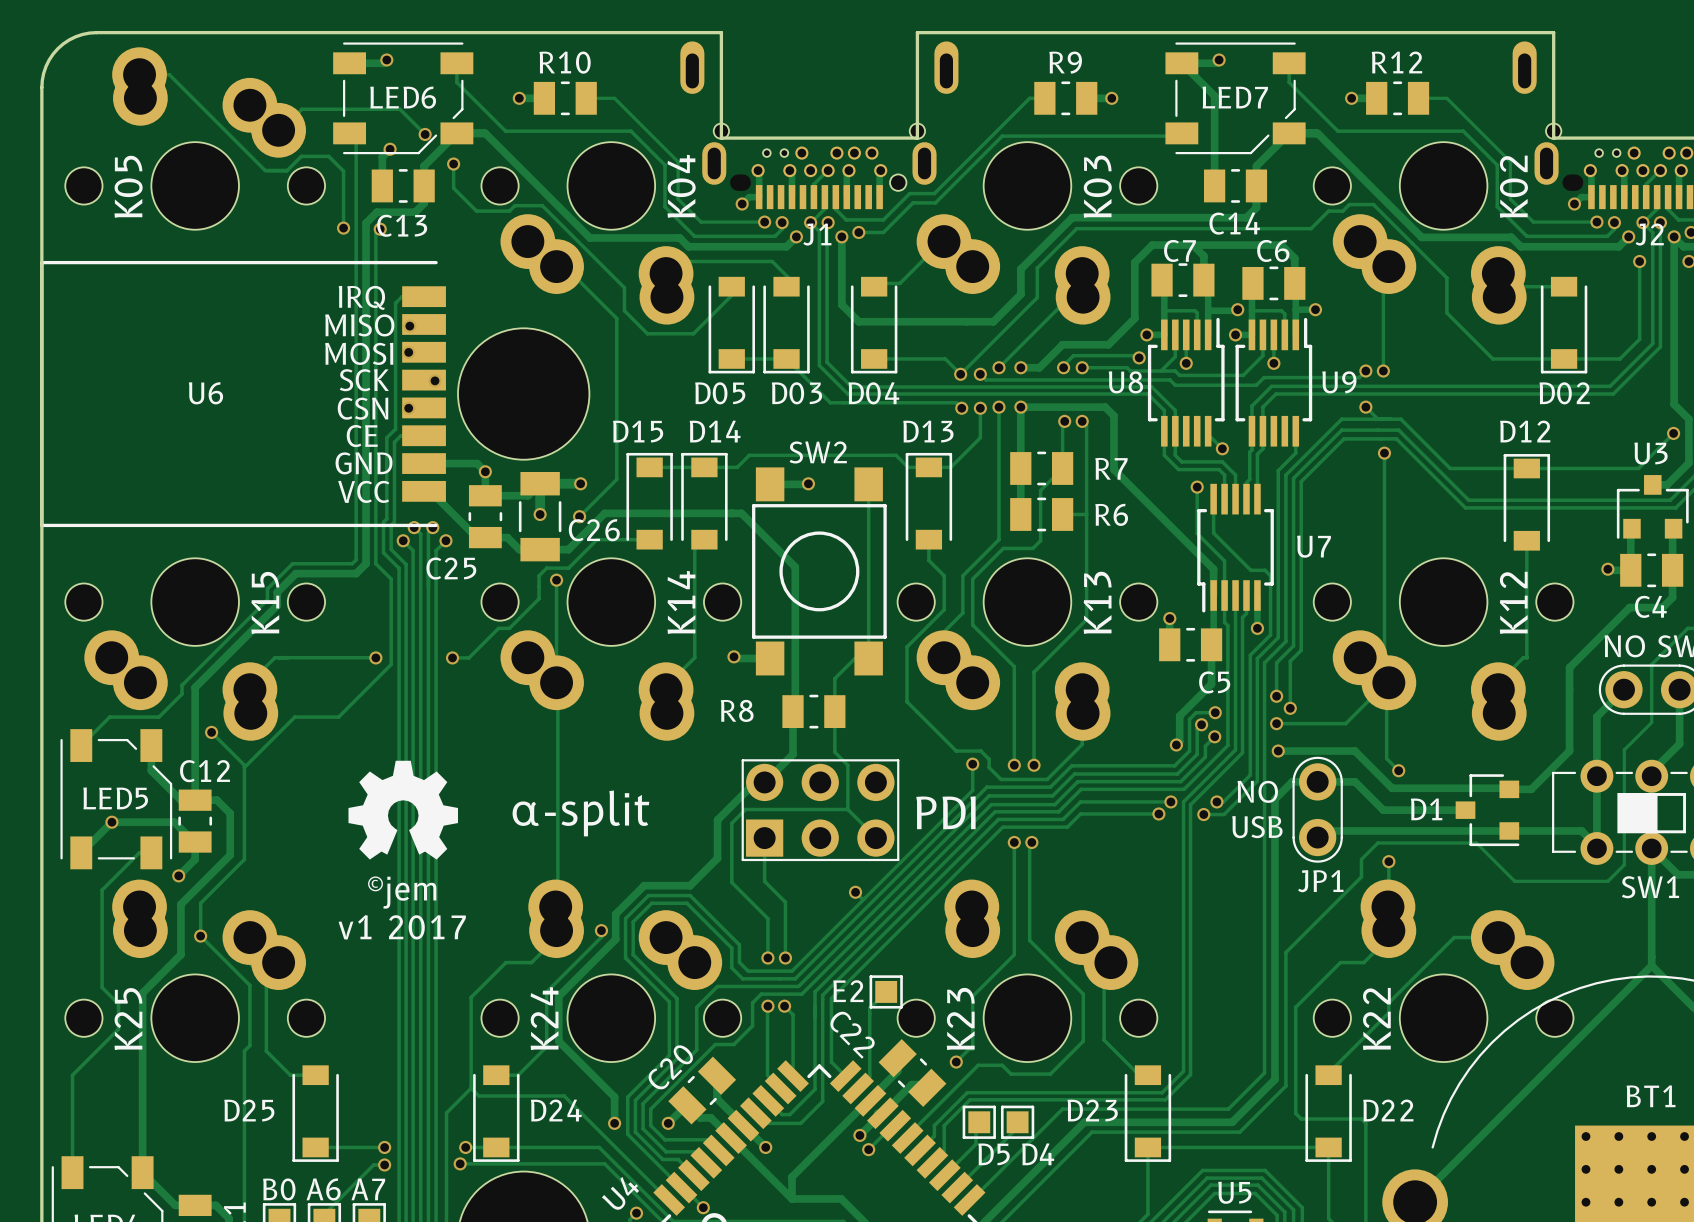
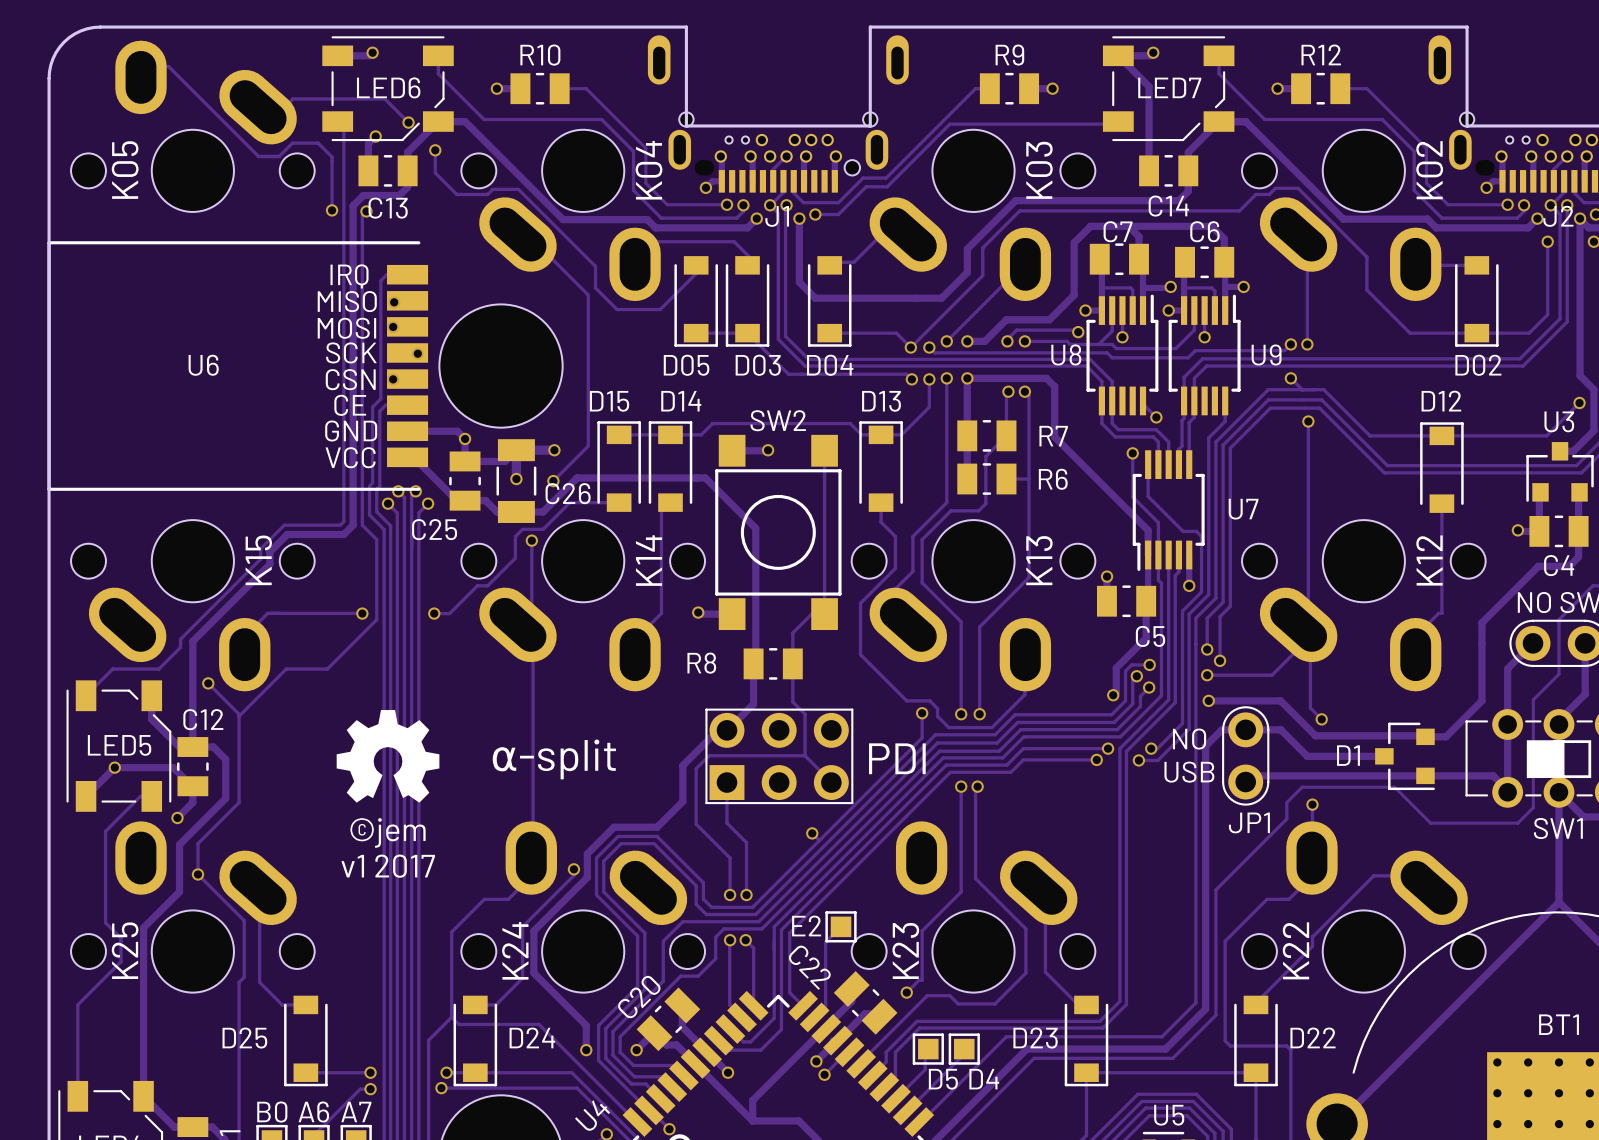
K05 footprint: [65, 47, 326, 230] -> [71, 40, 315, 212]
K04 footprint: [481, 142, 695, 325] -> [461, 129, 661, 302]
K03 footprint: [916, 142, 1158, 325] -> [869, 129, 1096, 302]
K02 footprint: [1313, 142, 1527, 325] -> [1242, 129, 1442, 302]
K15 footprint: [65, 558, 326, 741] -> [71, 520, 315, 692]
K14 footprint: [481, 558, 742, 741] -> [461, 520, 706, 692]
K13 footprint: [897, 558, 1158, 741] -> [851, 520, 1096, 692]
K12 footprint: [1313, 558, 1574, 741] -> [1242, 520, 1486, 692]
K25 footprint: [65, 879, 326, 1063] -> [71, 821, 315, 993]
K24 footprint: [481, 879, 742, 1063] -> [461, 821, 706, 993]
K23 footprint: [897, 879, 1158, 1063] -> [851, 821, 1096, 993]
K22 footprint: [1313, 879, 1574, 1063] -> [1242, 821, 1486, 993]

